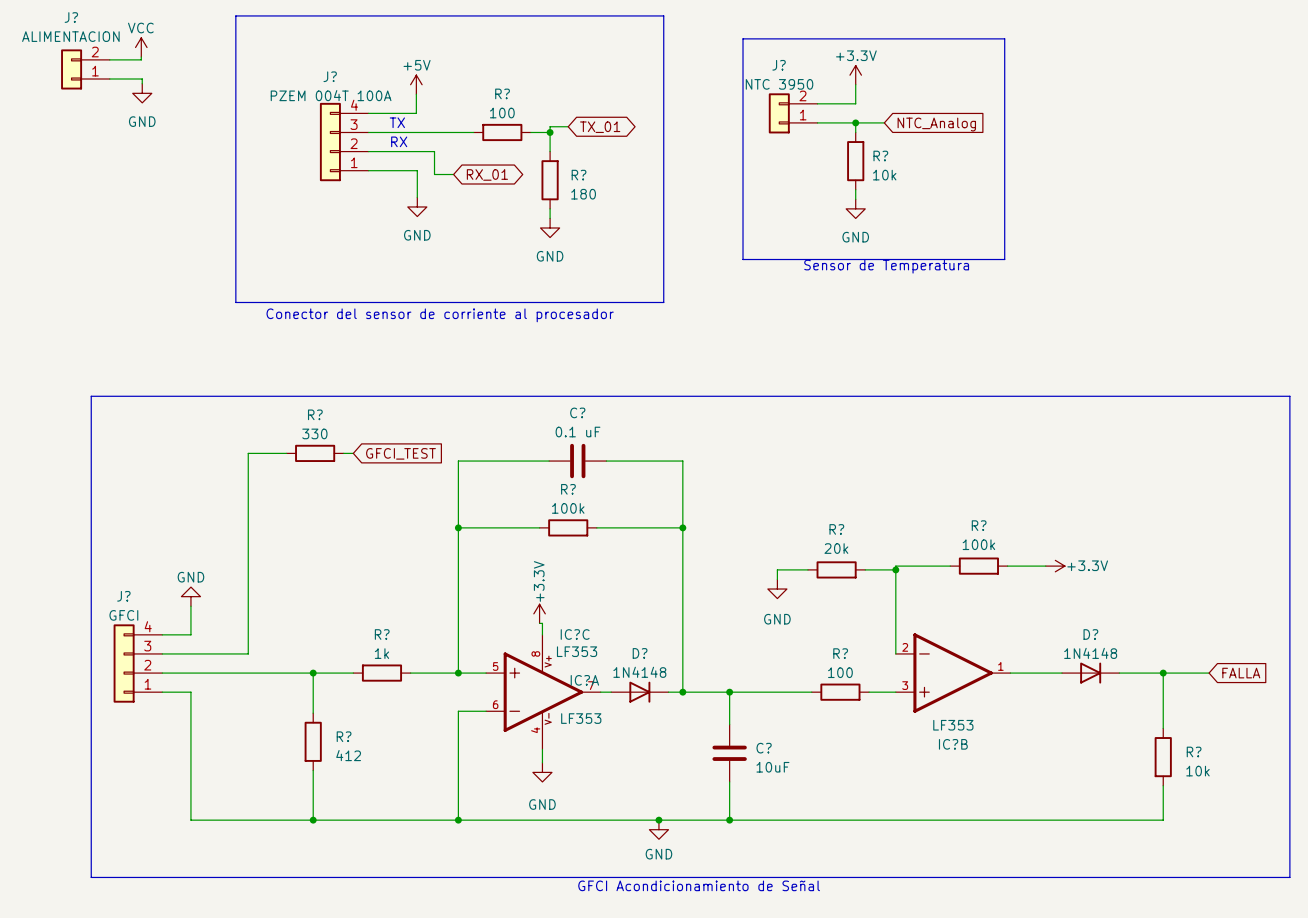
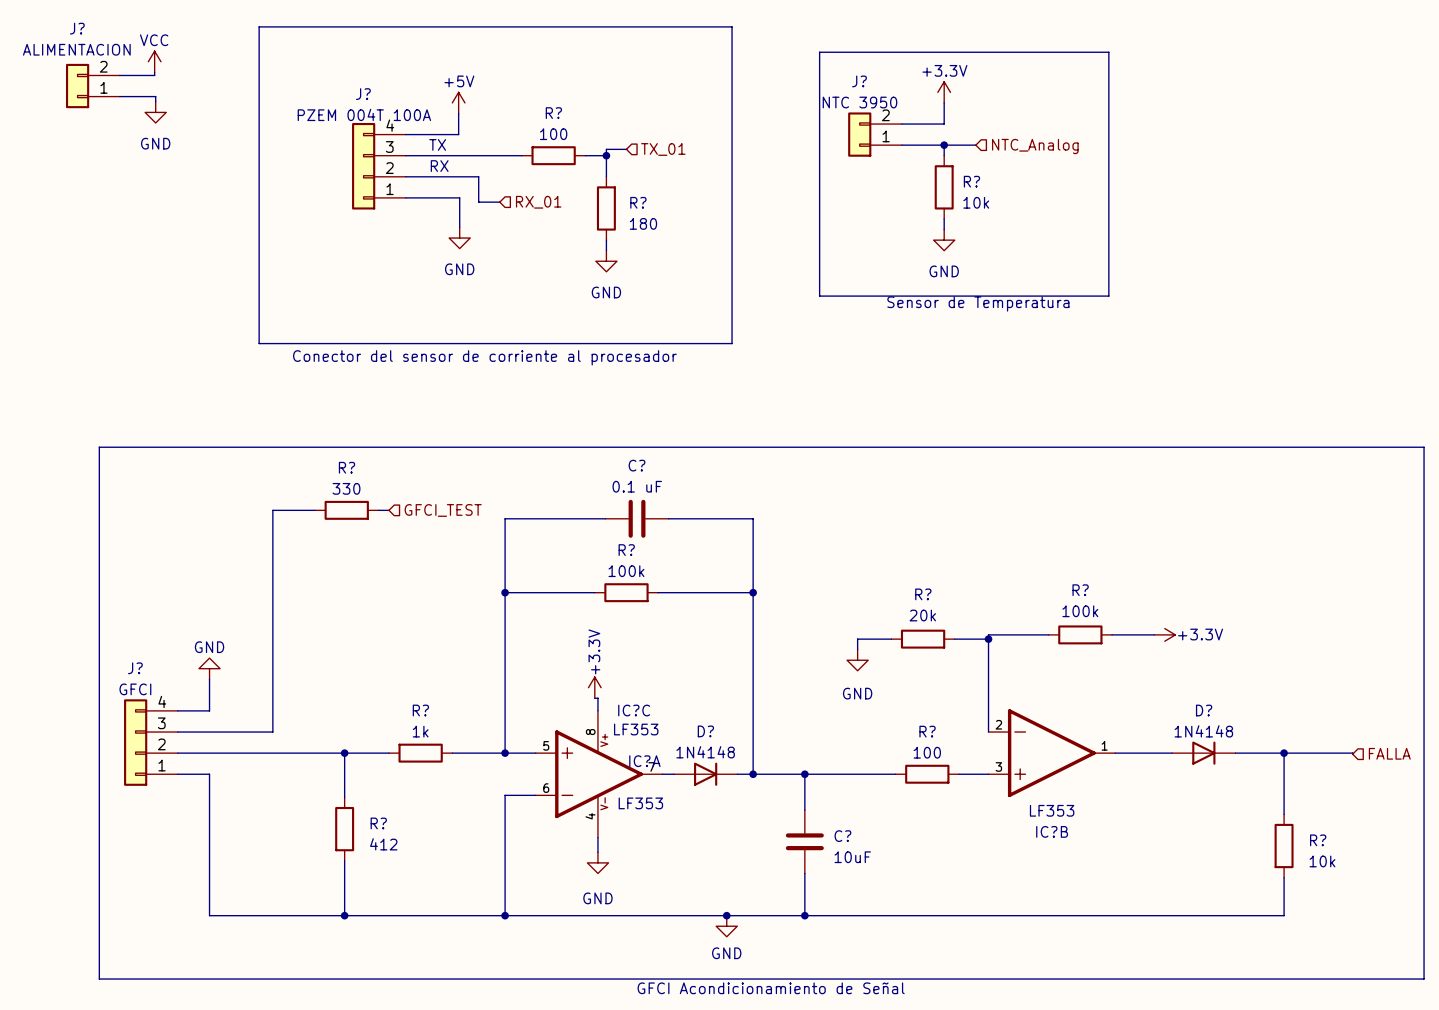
global label: NTC_Analog (936, 124) -> none
hierarchical label: none -> NTC_Analog (1035, 146)
hierarchical label: none -> TX_01 (663, 149)
global label: TX_01 (600, 127) -> none
global label: RX_01 (487, 174) -> none
hierarchical label: none -> RX_01 (538, 202)
global label: GFCI_TEST (400, 453) -> none
hierarchical label: none -> GFCI_TEST (443, 510)
wire: none -> (1334, 753) (1352, 754)
global label: FALLA (1241, 673) -> none
hierarchical label: none -> FALLA (1389, 753)

